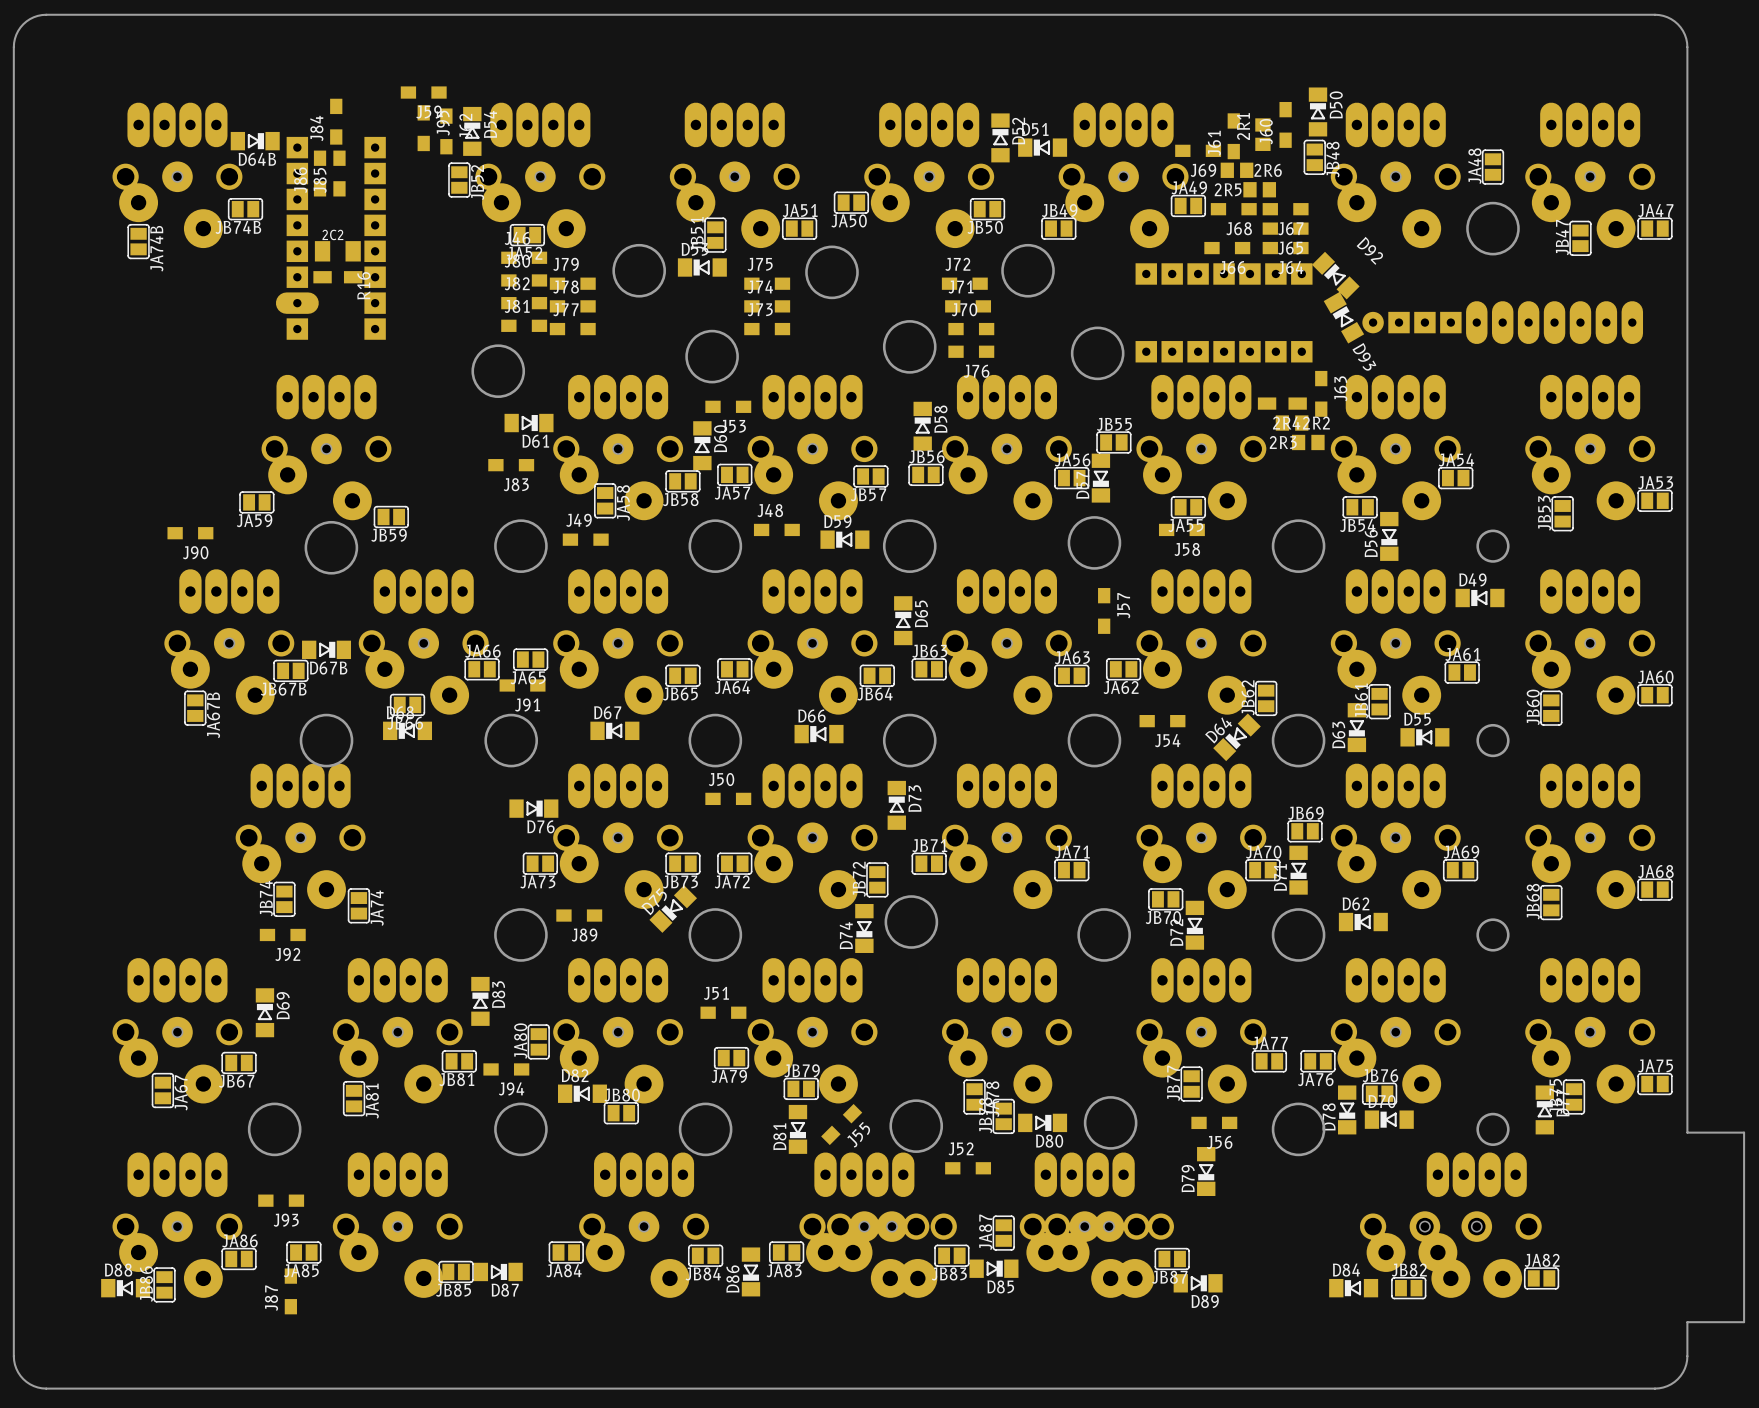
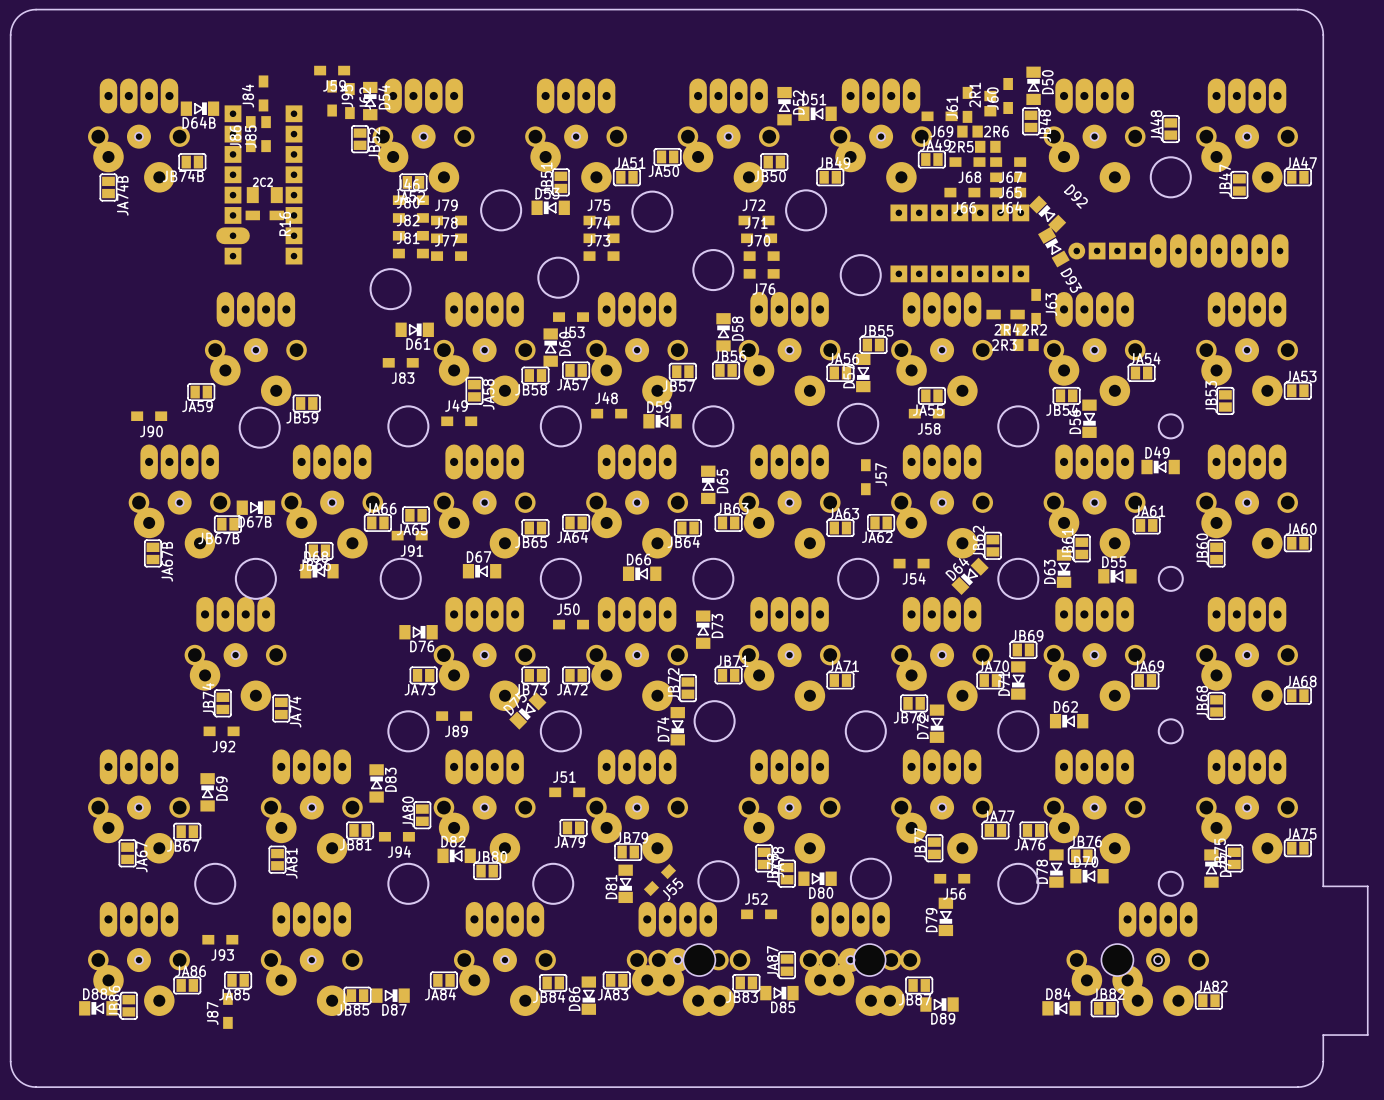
part footprint: [826, 1211, 957, 1298] -> [648, 944, 751, 1016]
part footprint: [1044, 1211, 1174, 1298] -> [818, 944, 921, 1016]
part footprint: [1359, 1211, 1490, 1298] -> [1066, 944, 1169, 1016]

